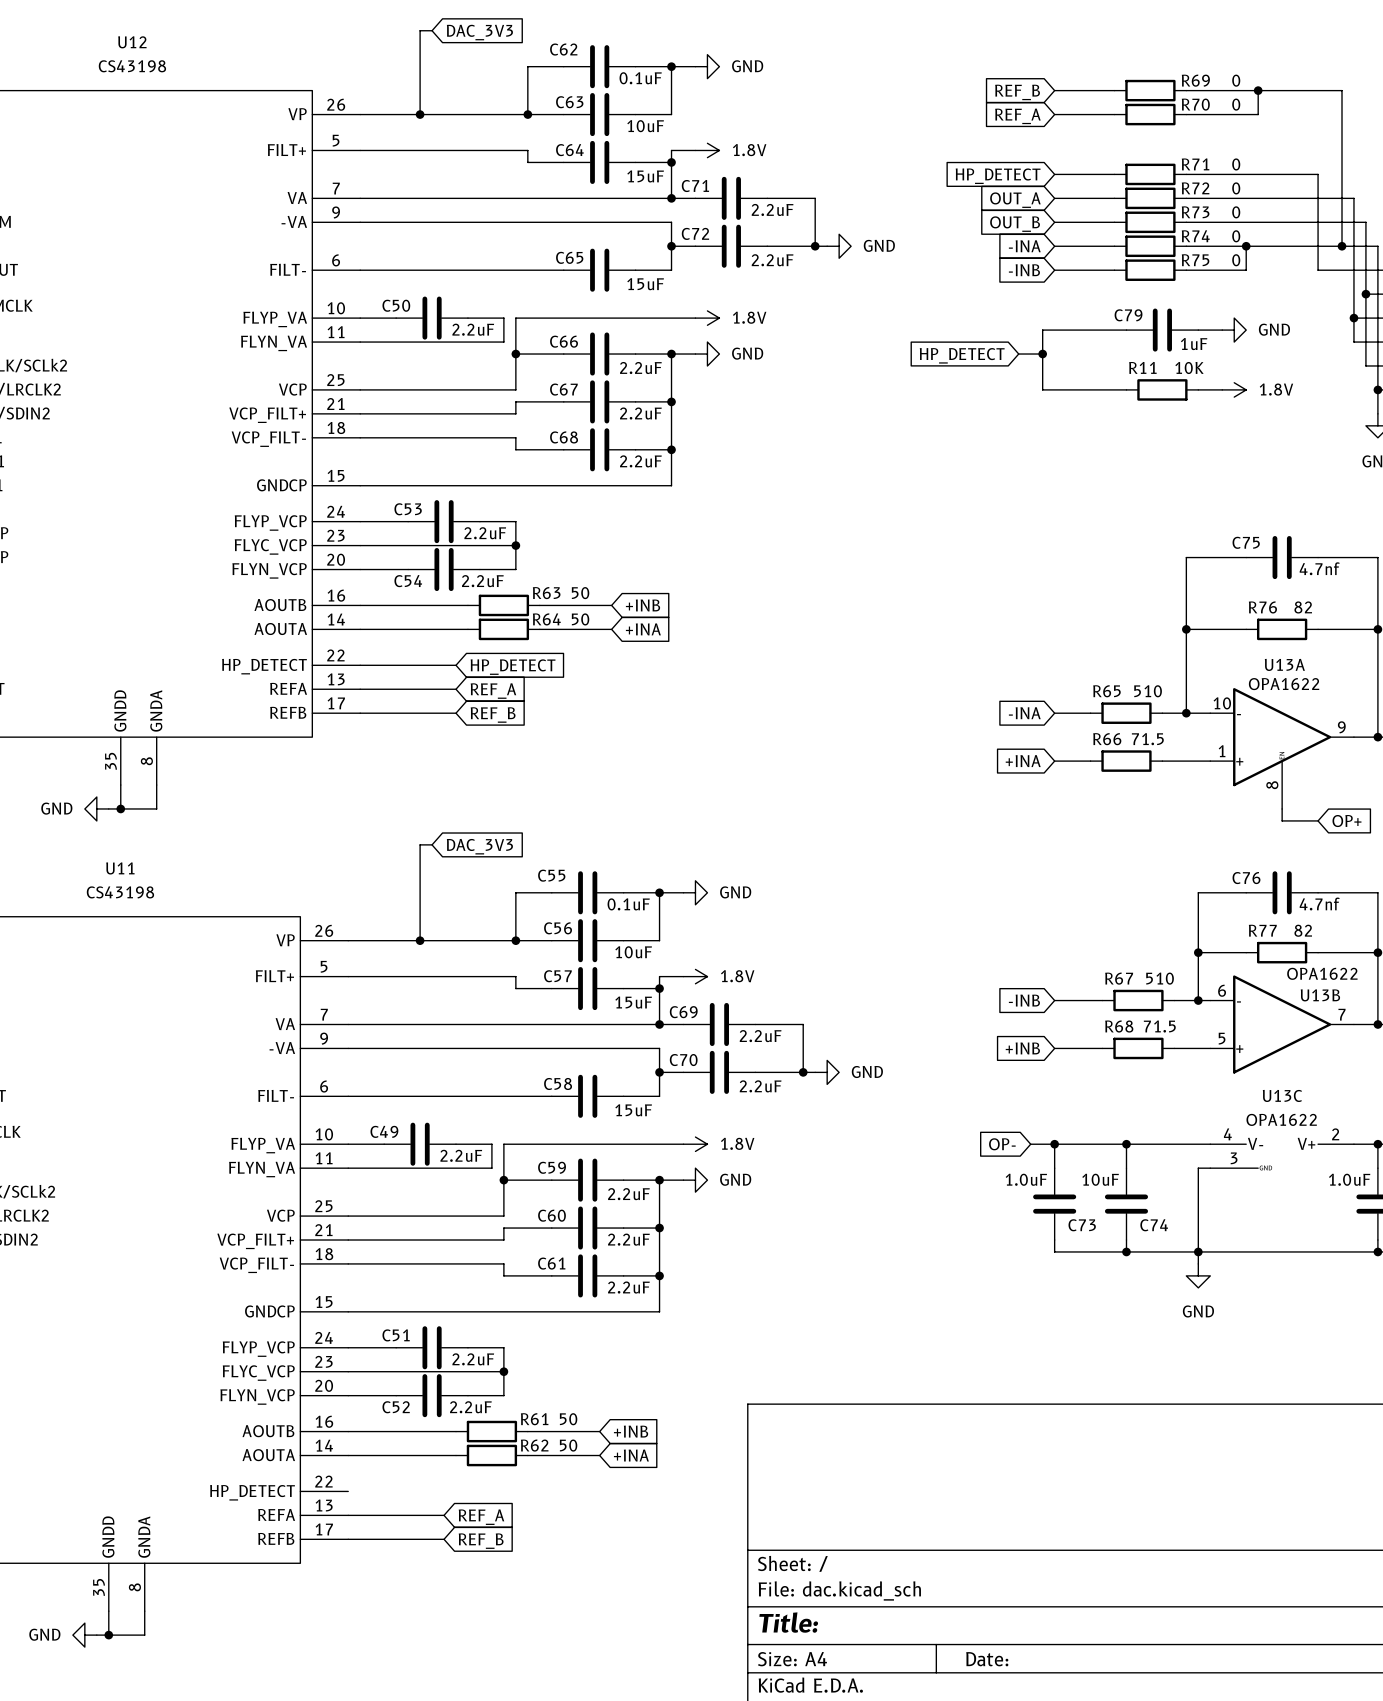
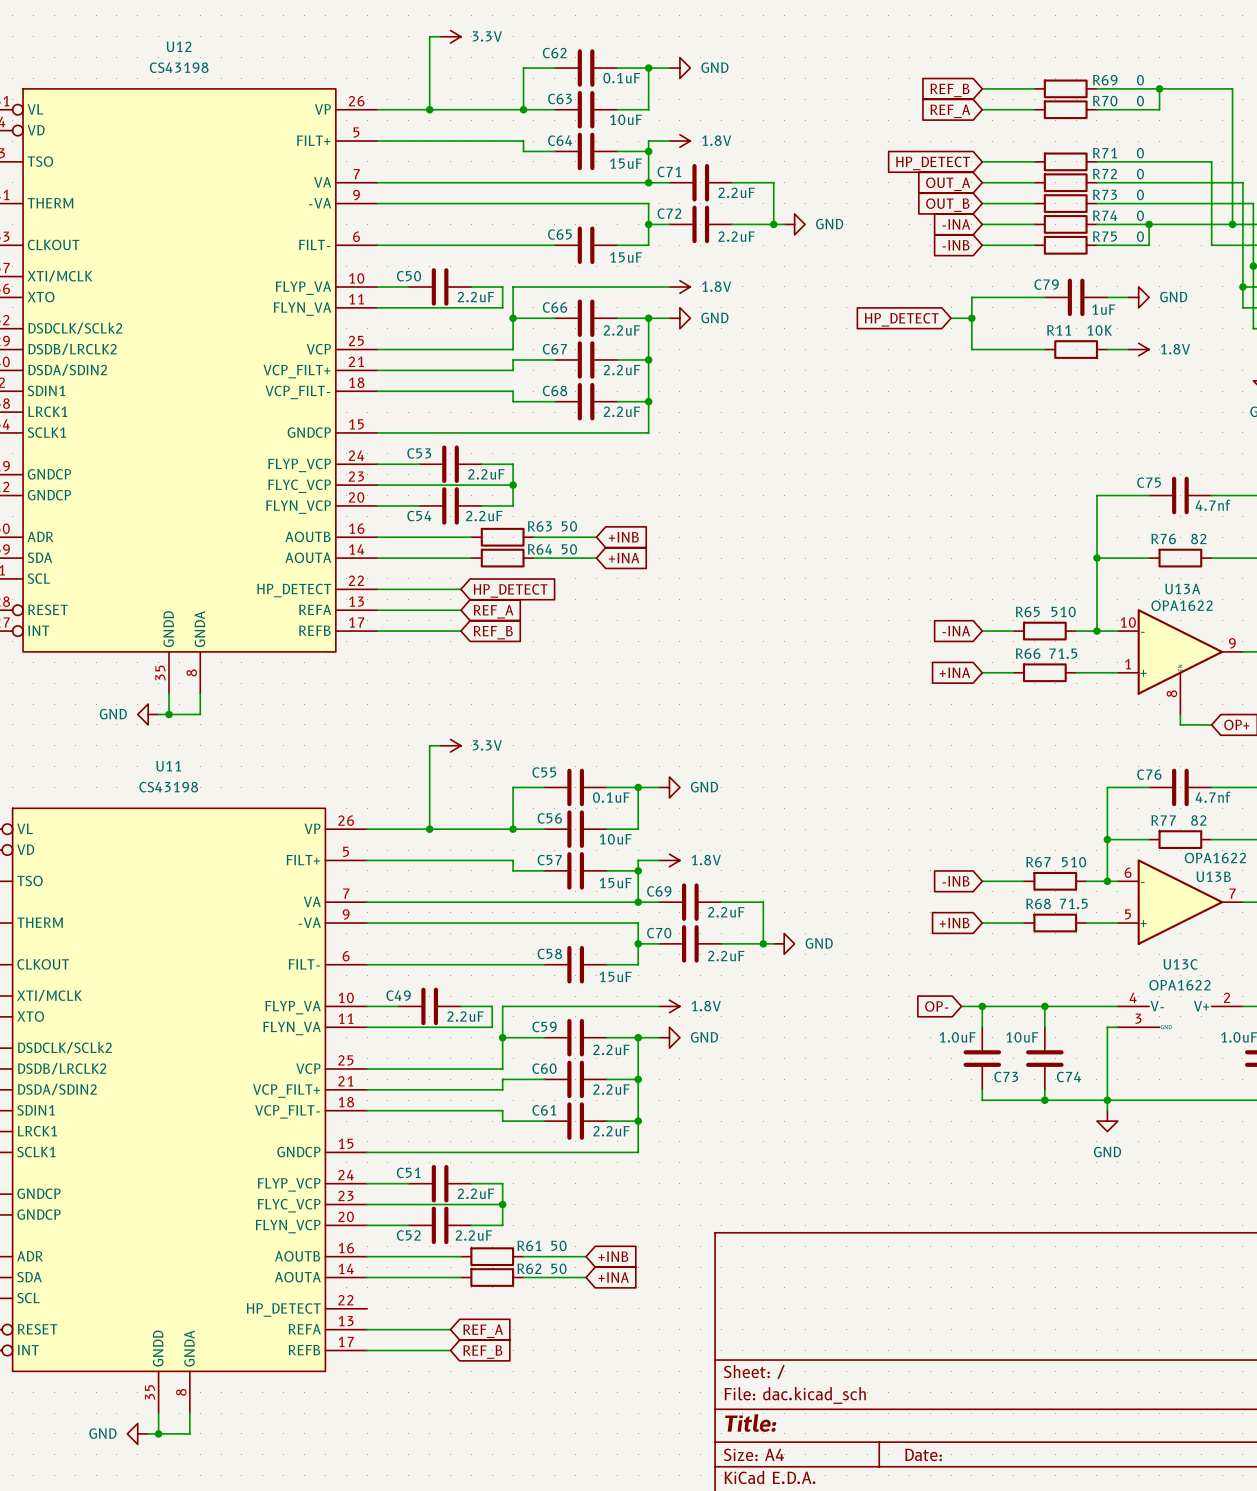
power symbol: none -> 3.3V (450, 36)
global label: DAC_3V3 (479, 32) -> none
power symbol: none -> 3.3V (450, 745)
global label: DAC_3V3 (479, 846) -> none

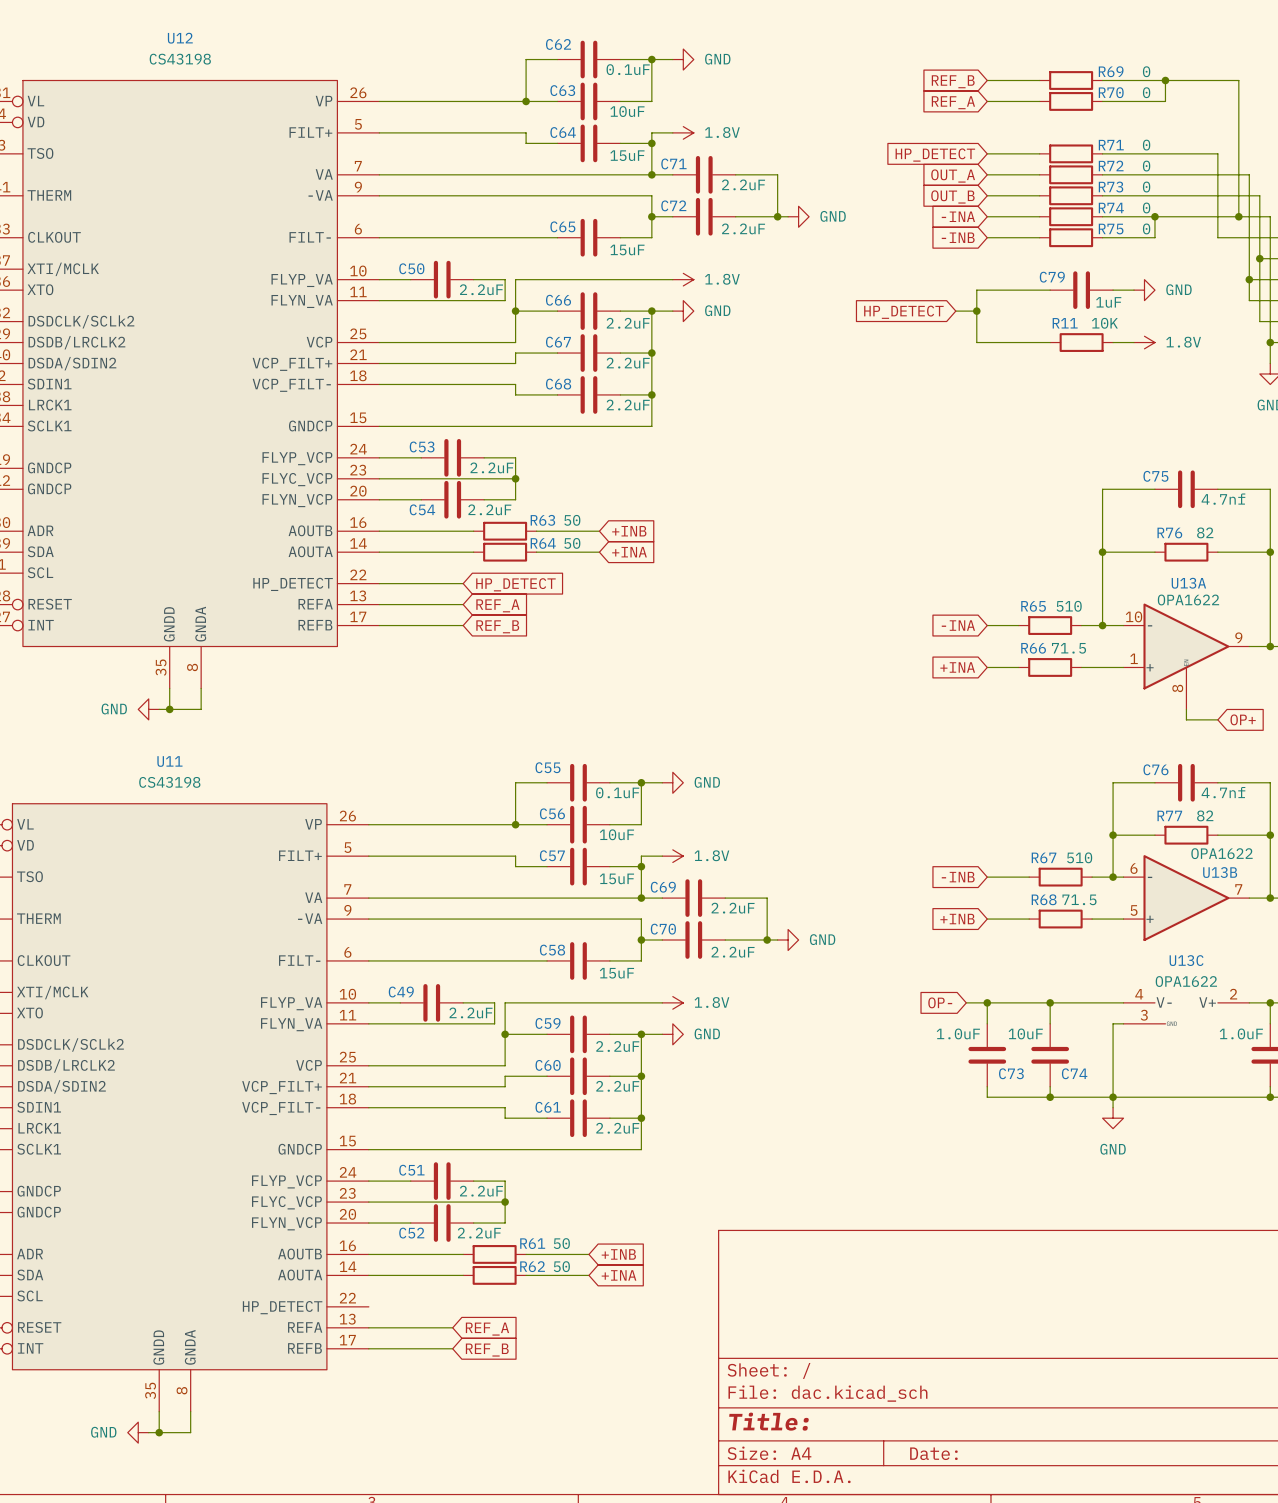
wire: (440, 36) (429, 36) (429, 109) -> none
power symbol: 3.3V (450, 36) -> none
junction: (429, 109) -> none
wire: (440, 745) (429, 745) (429, 829) -> none
power symbol: 3.3V (450, 745) -> none
junction: (429, 829) -> none

